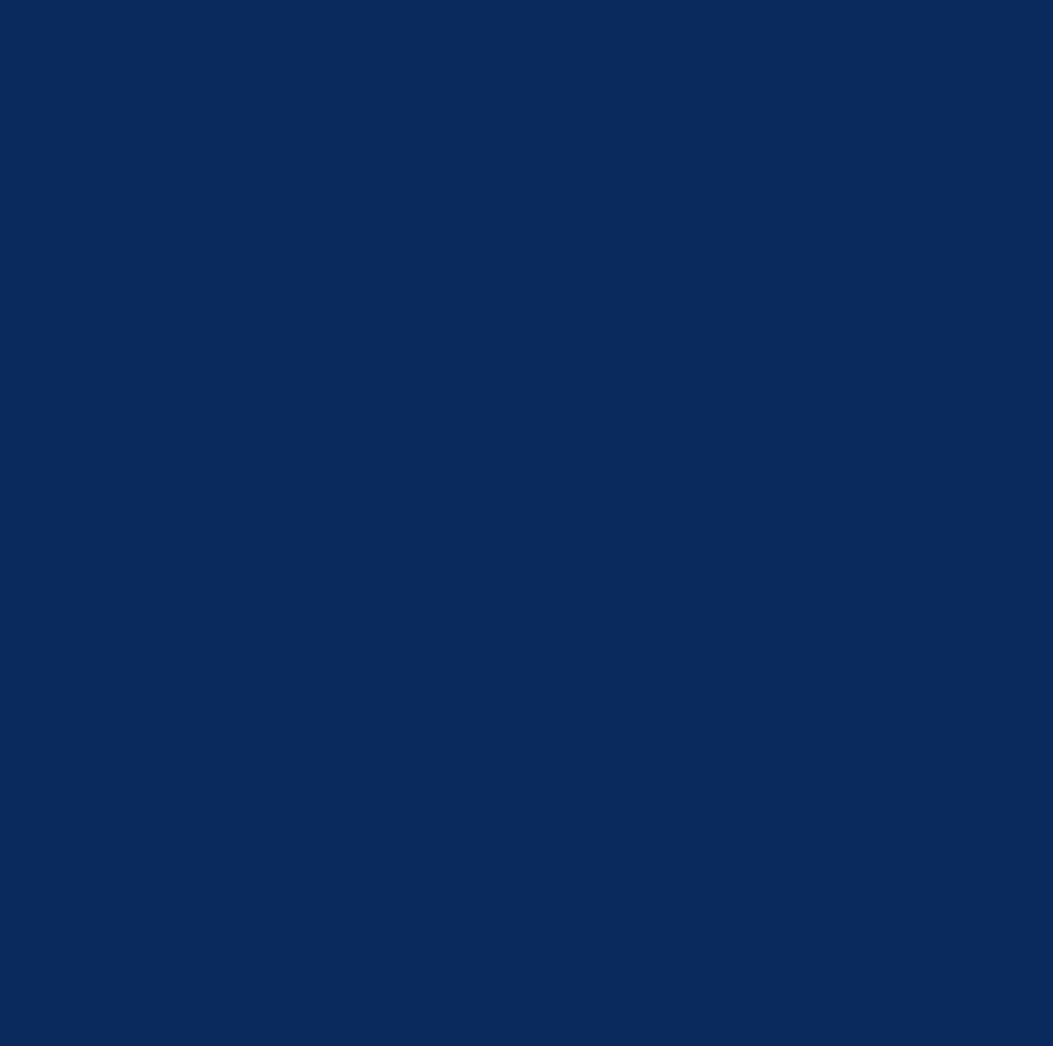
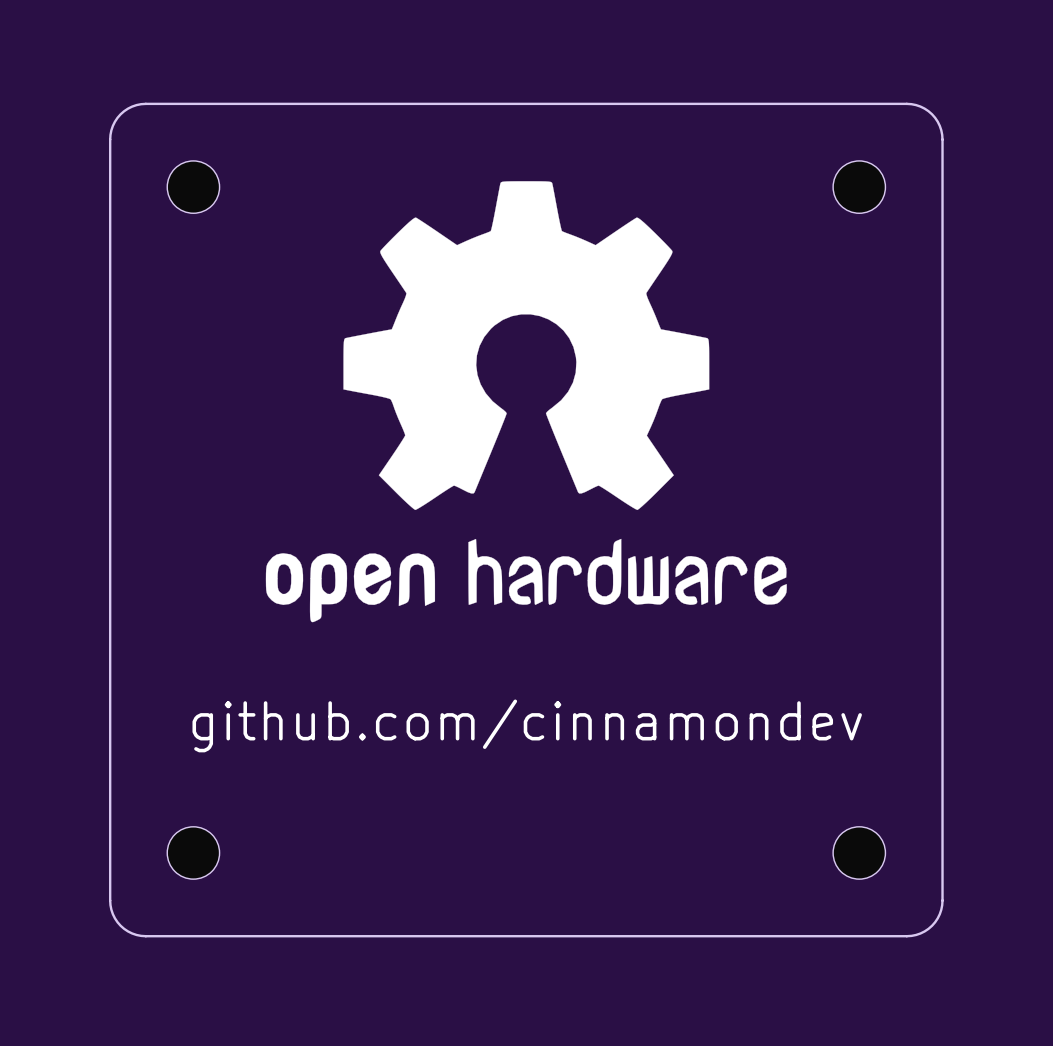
board edge: none -> (906, 103) (145, 103) (132, 106) (120, 114) (112, 125) (110, 139) (110, 900) (112, 914) (120, 925) (132, 933) (145, 936) (906, 936) (920, 933) (932, 925) (939, 914) (942, 900) (942, 139) (939, 125) (932, 114) (920, 106) (906, 103)
drawing: none -> [265, 181, 787, 623]
part: none -> (193, 187)
part: none -> (859, 187)
text: none -> github.com/cinnamondev (527, 725)
part: none -> (193, 852)
part: none -> (859, 852)

